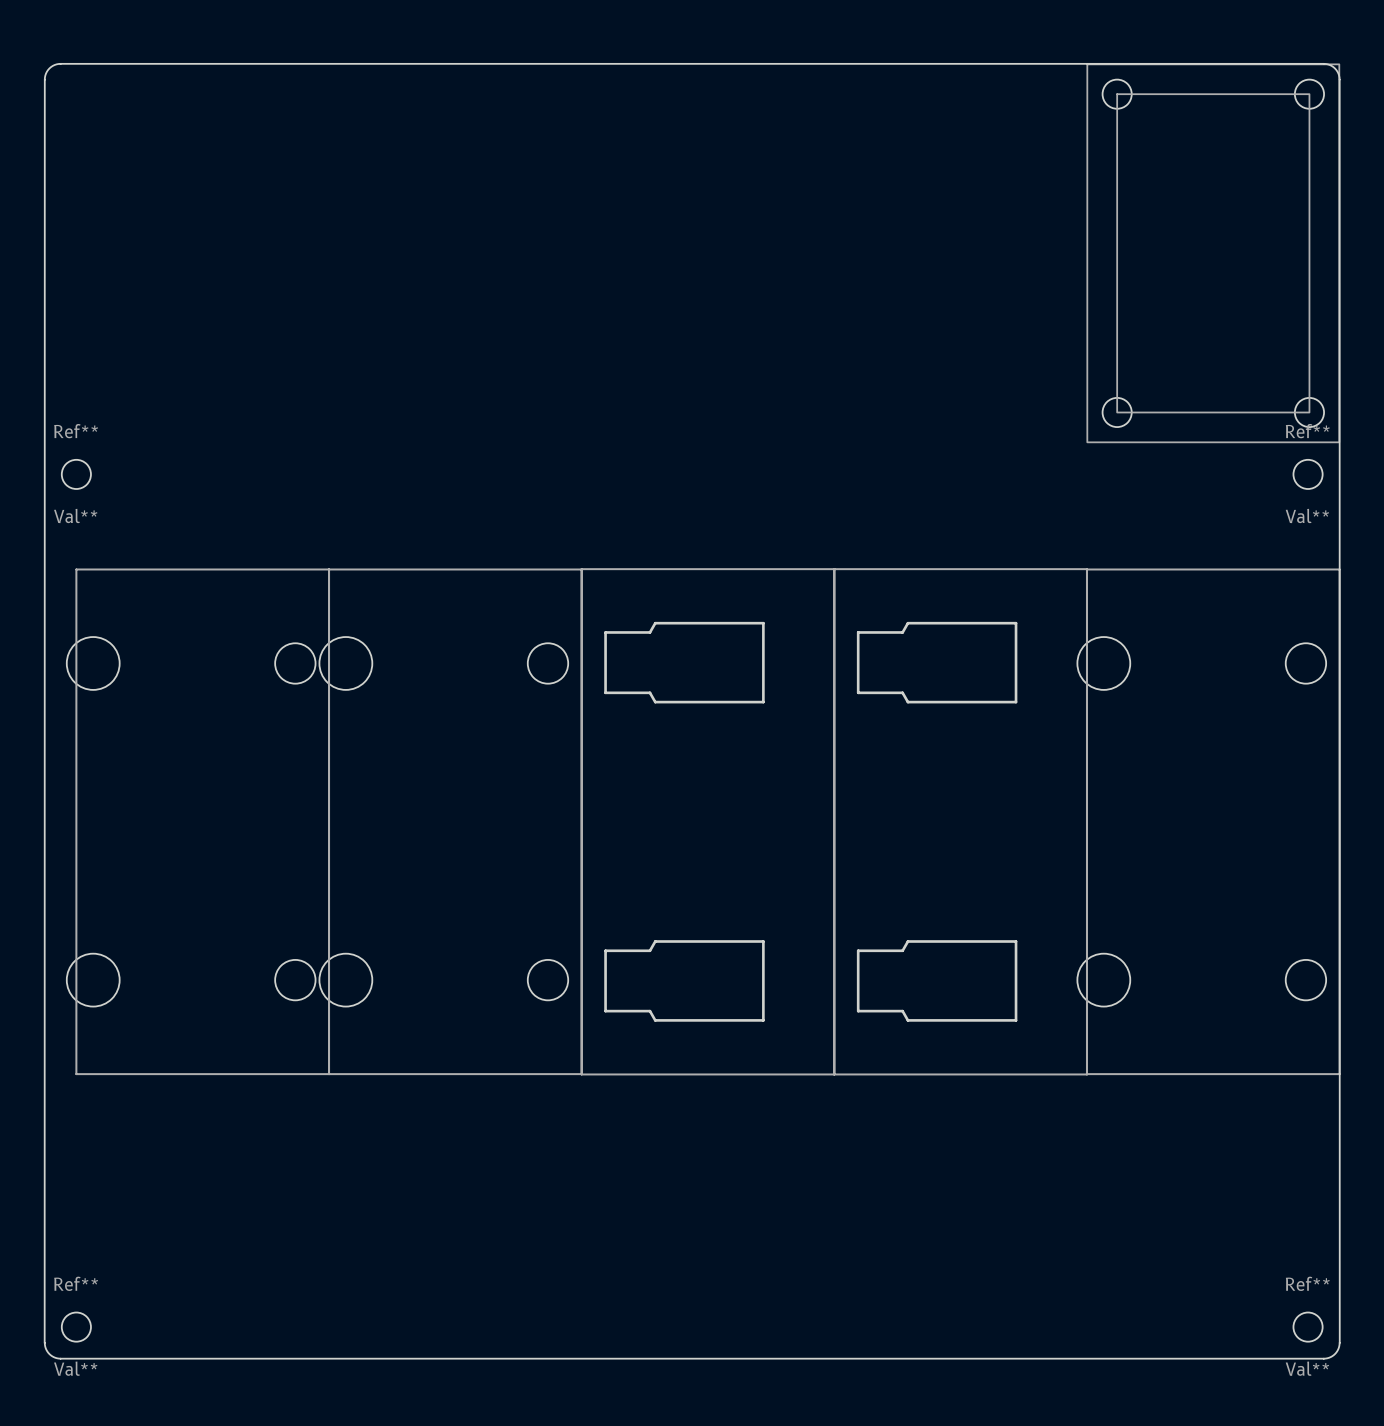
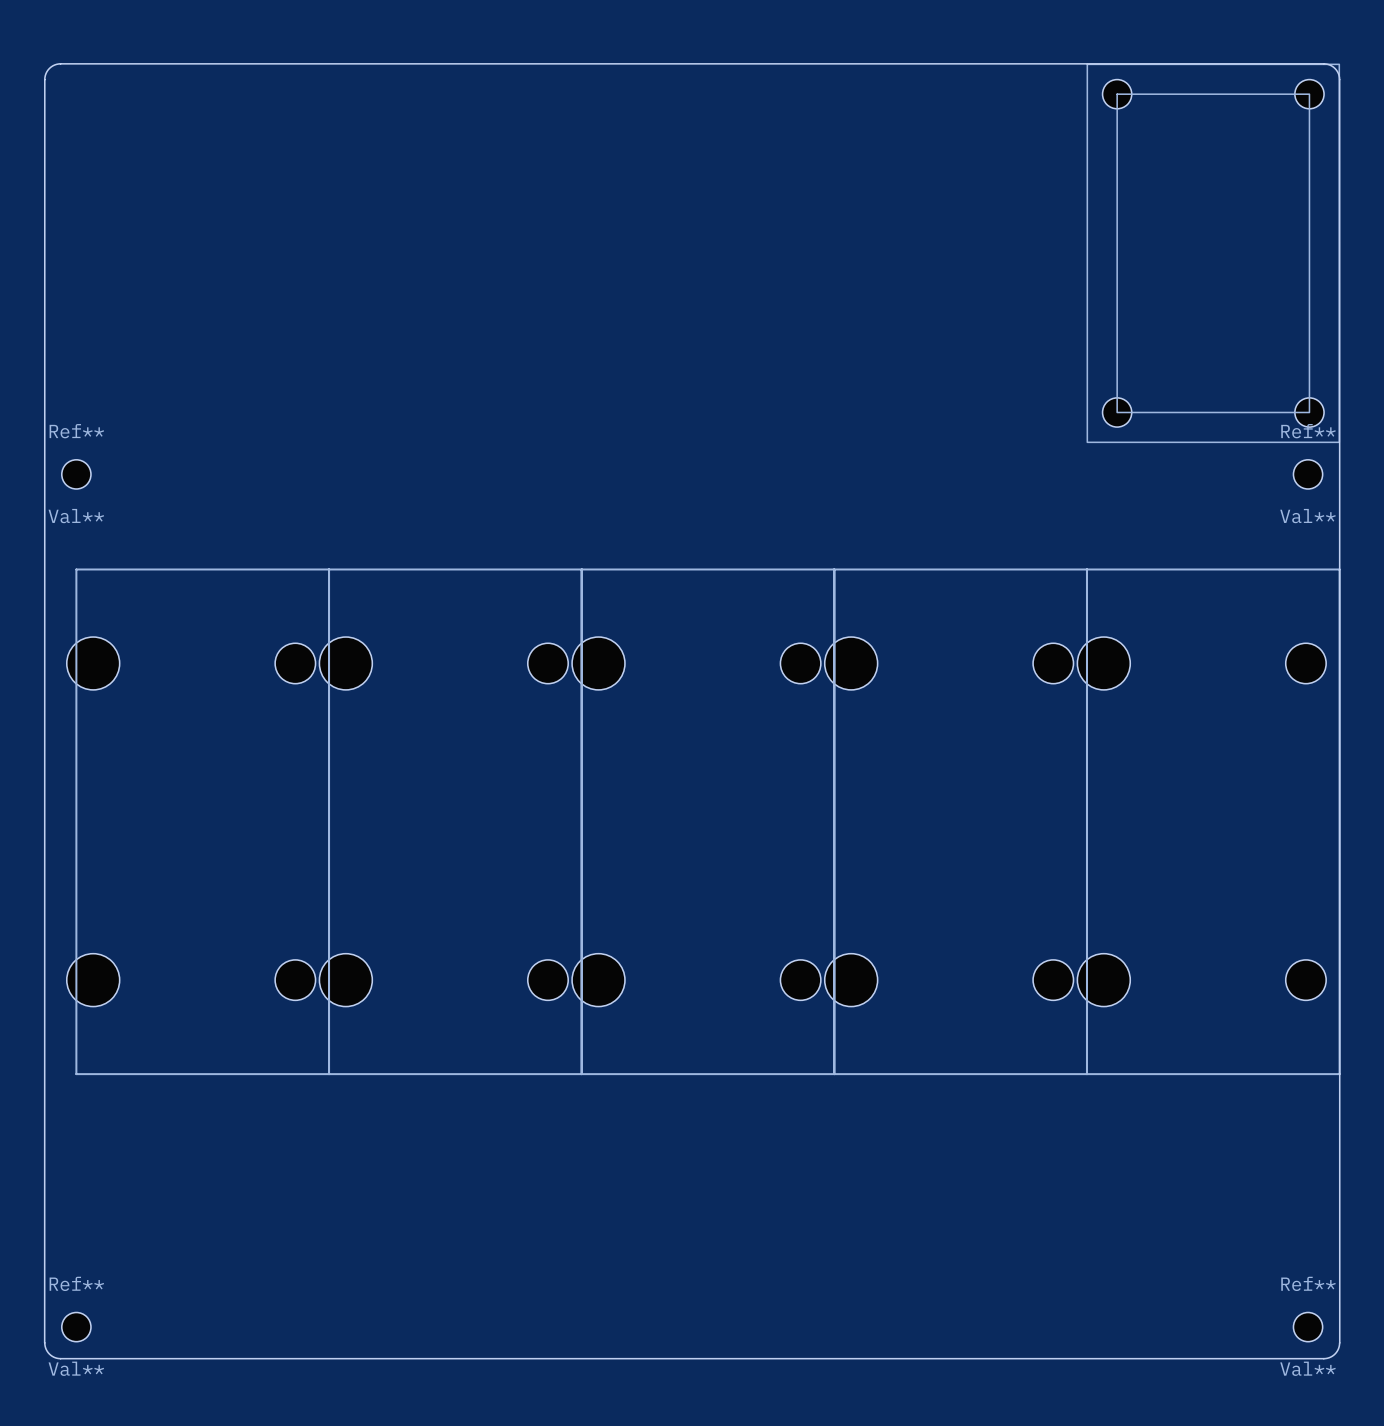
drawing: [580, 568, 1088, 1076] -> none
part: none -> (703, 821)
part: none -> (956, 821)

